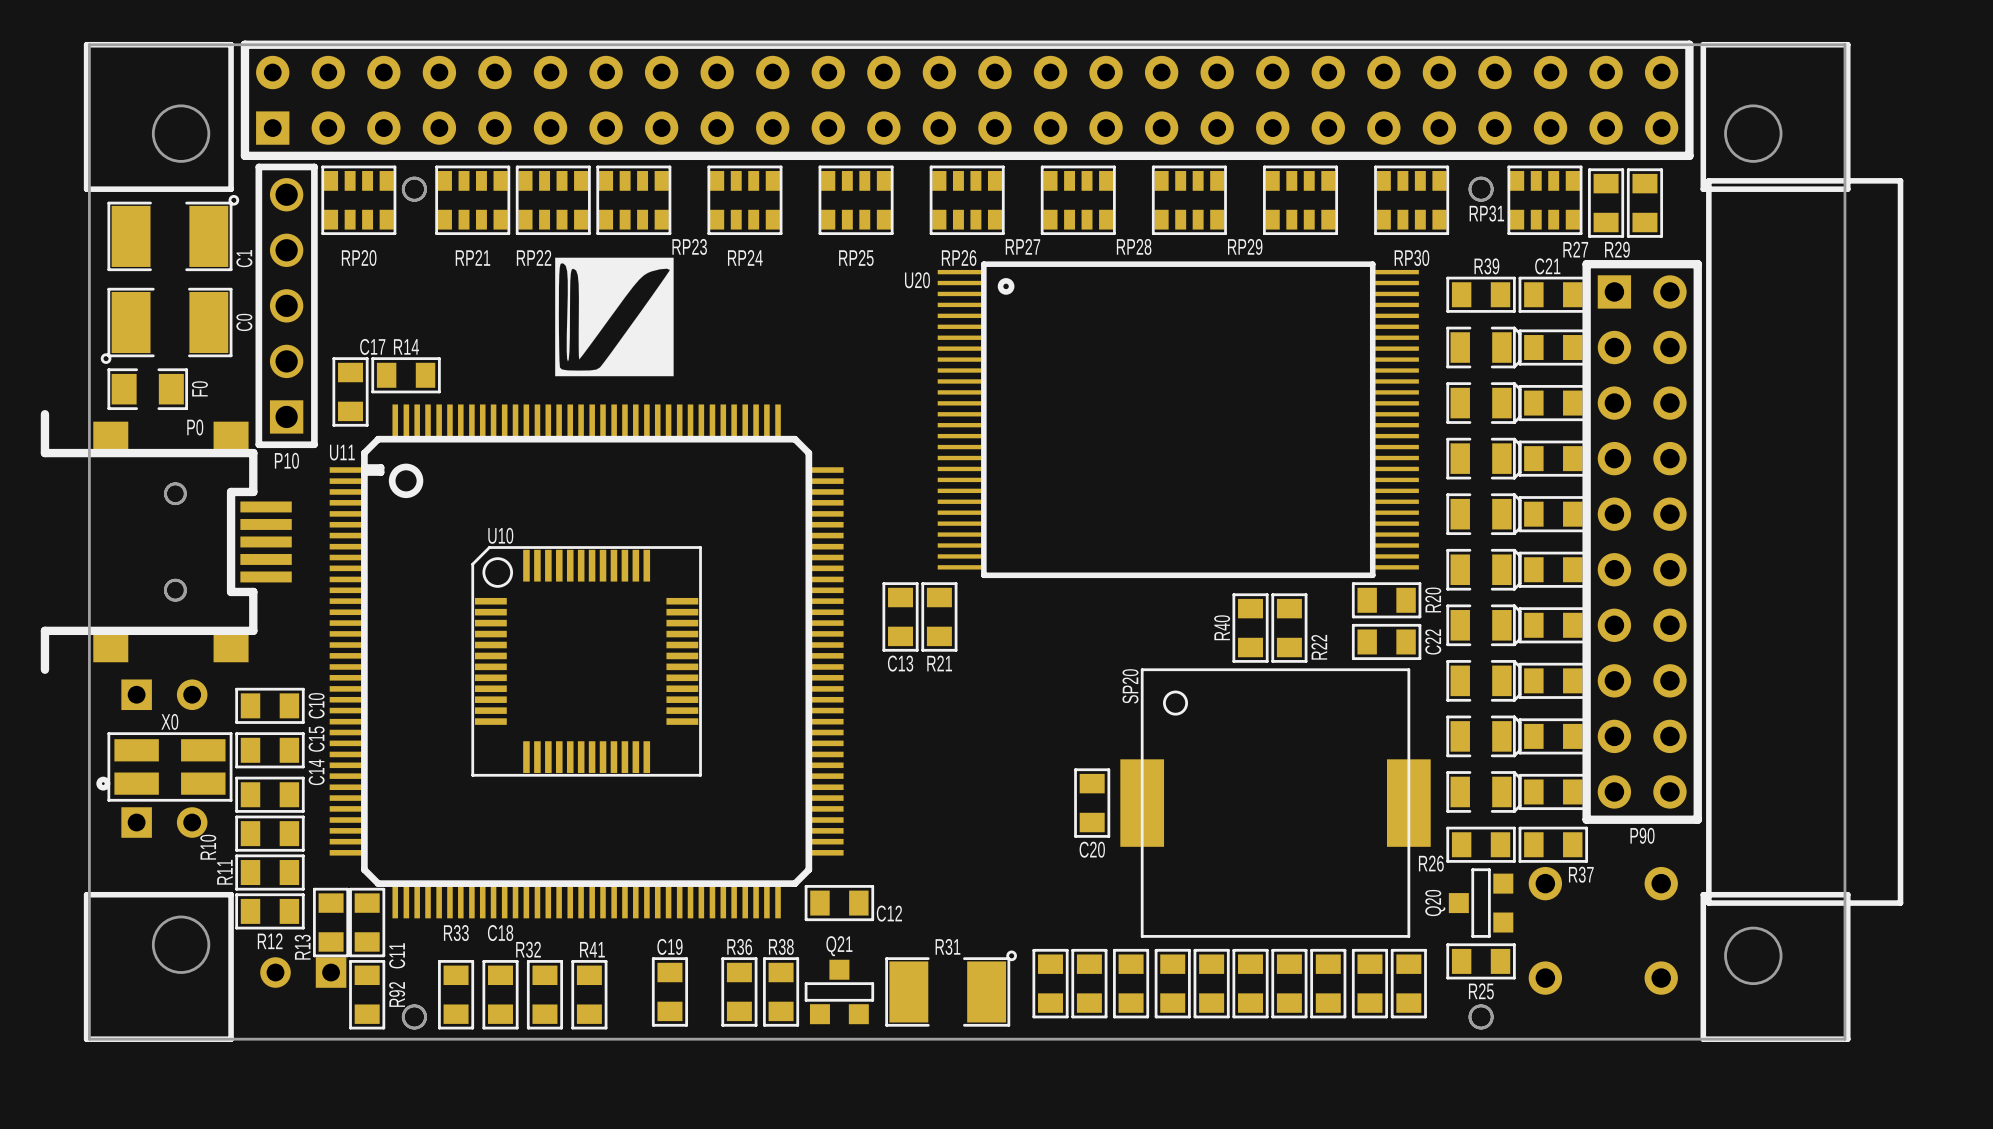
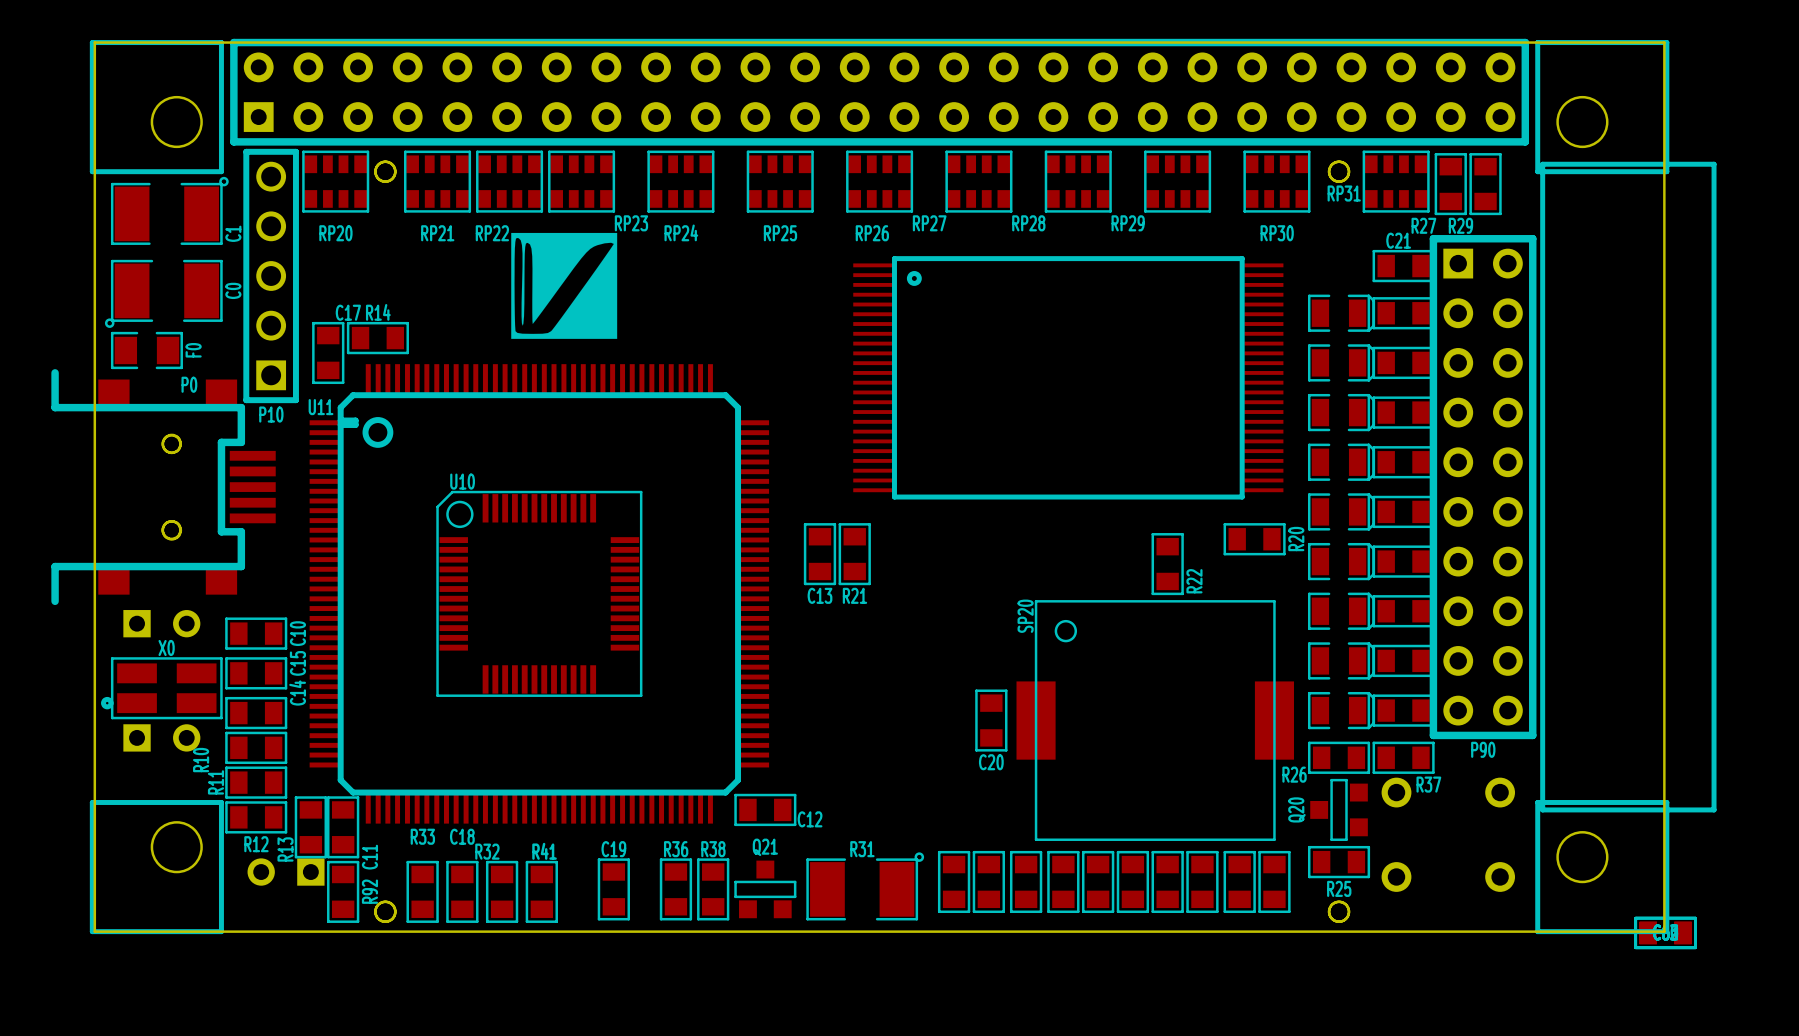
R39: (1481, 294) -> none
U20: (1178, 419) -> none
part: none -> (1068, 377)
R40: (1250, 628) -> none
C22: (1386, 641) -> none
part: none -> (1665, 932)
part: none -> (1665, 932)
part: none -> (1665, 932)

